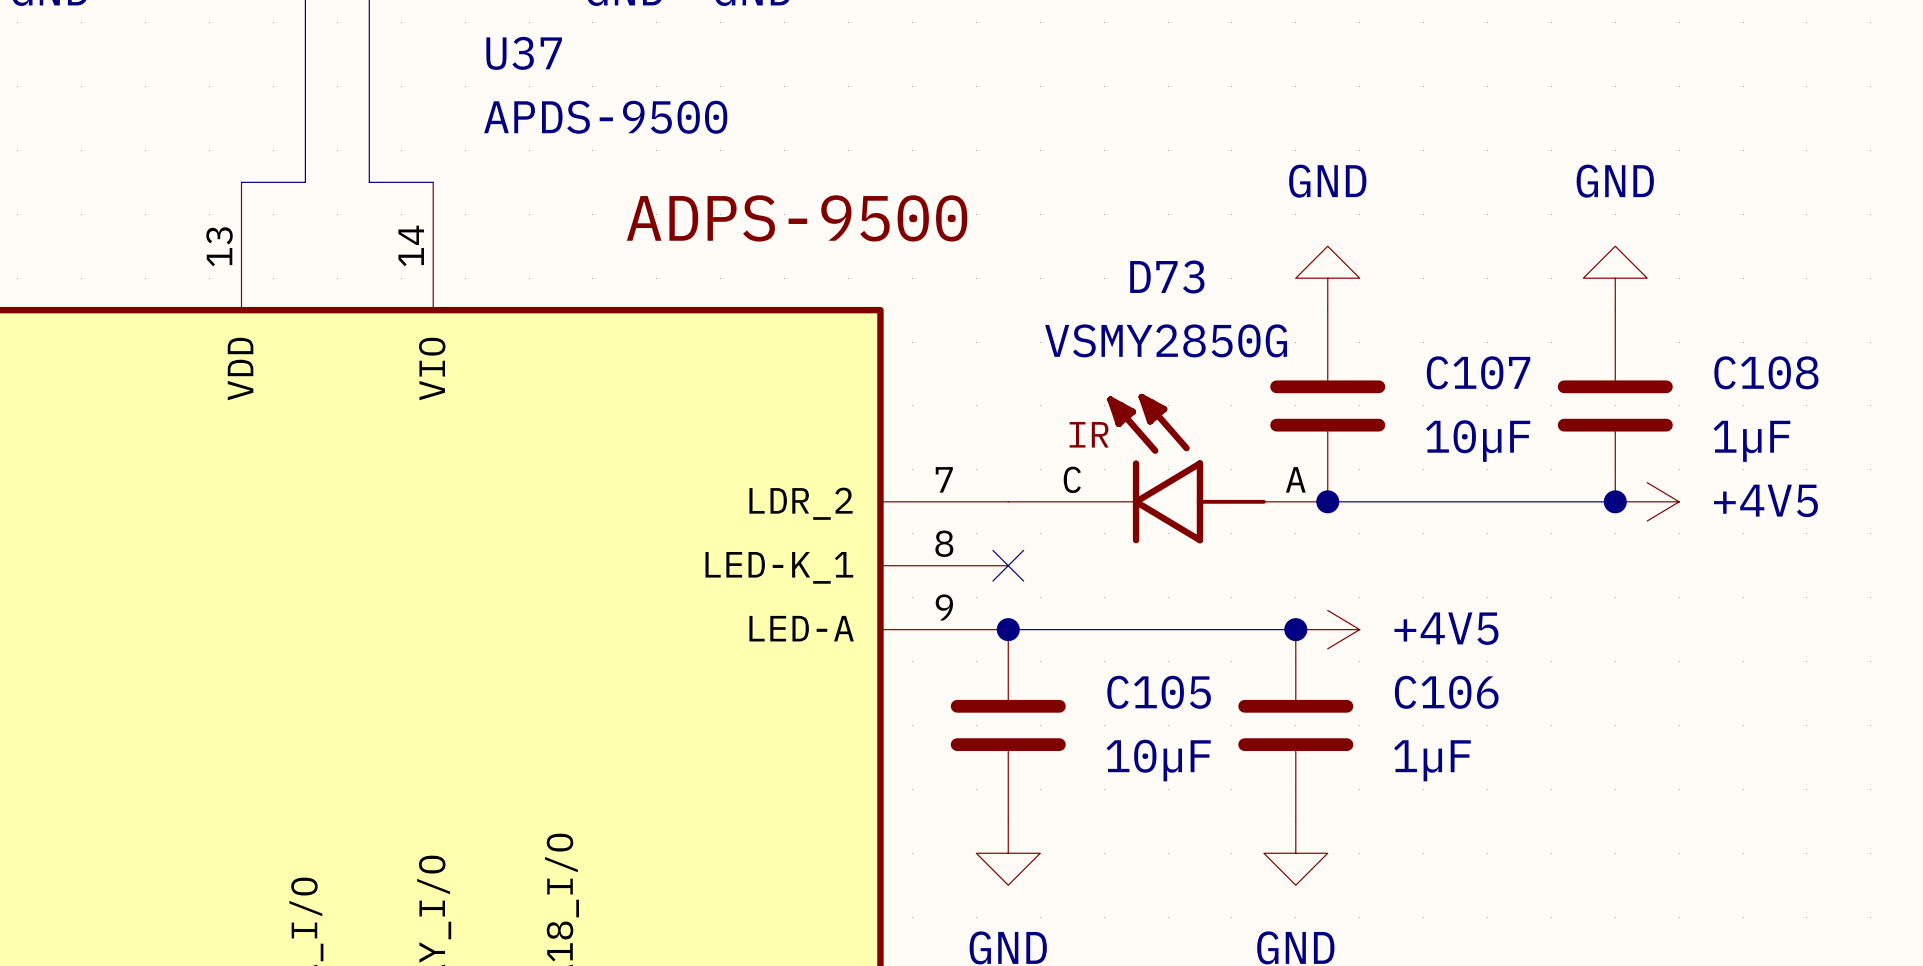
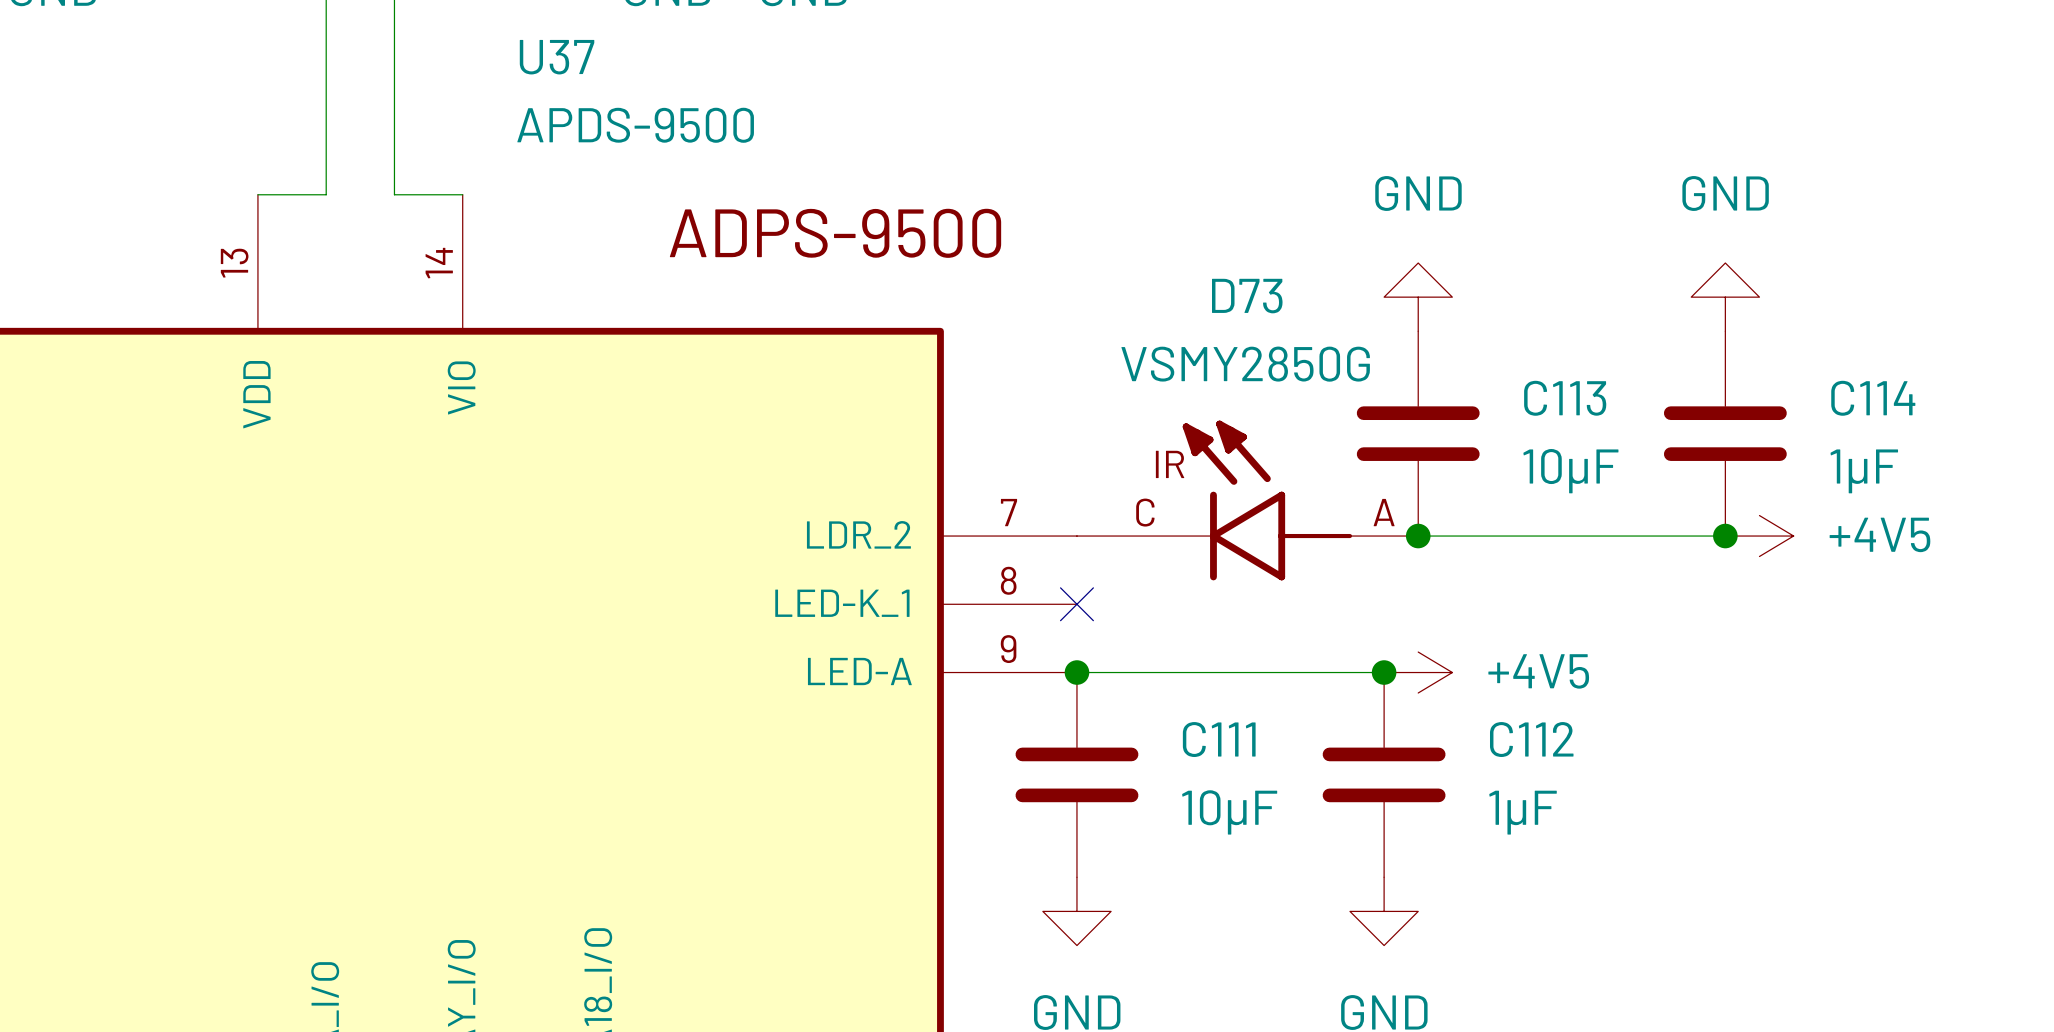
C107 name: C107 (1478, 372) -> C113 (1565, 398)
C108 name: C108 (1766, 372) -> C114 (1873, 398)
C105 name: C105 (1159, 692) -> C111 (1219, 739)
C106 name: C106 (1446, 692) -> C112 (1531, 739)

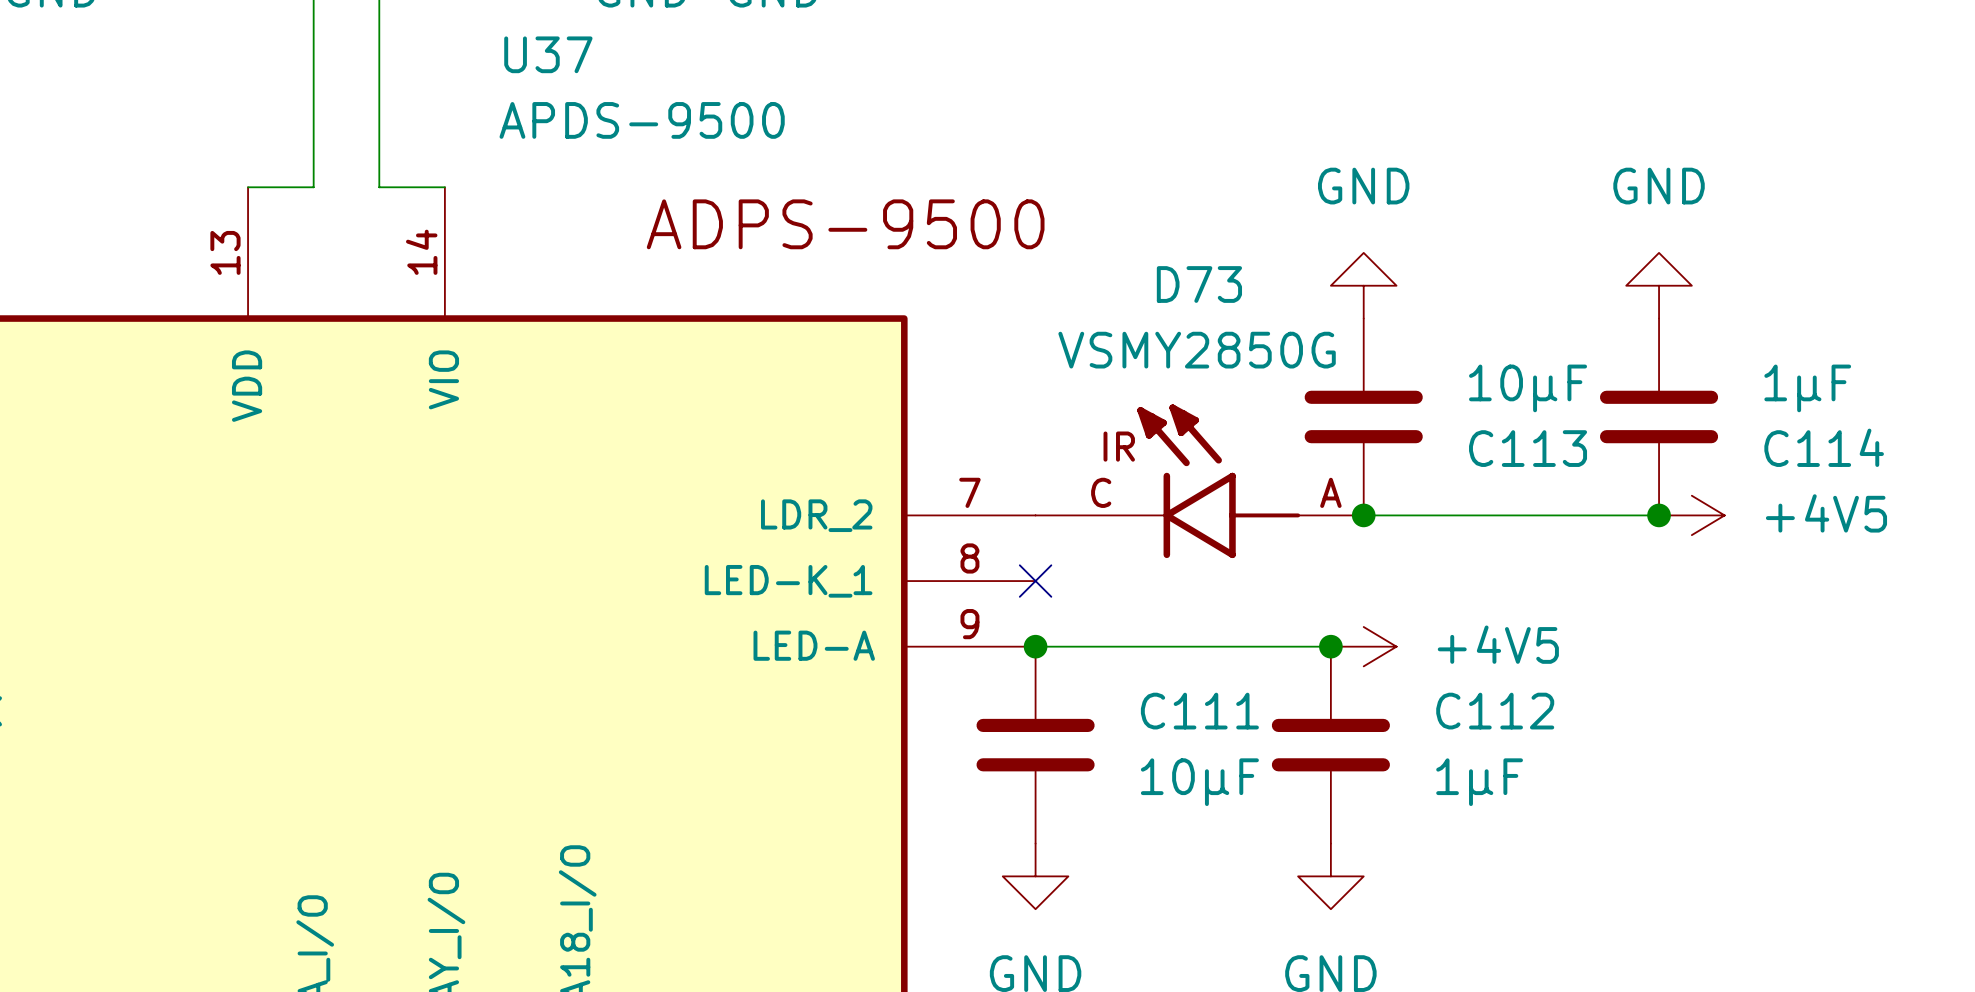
C113 name position: C113 (1565, 398) -> C113 (1528, 448)
C114 name position: C114 (1873, 398) -> C114 (1824, 447)
C113 value position: 10µF (1570, 471) -> 10µF (1528, 388)
C114 value position: 1µF (1864, 471) -> 1µF (1807, 388)

